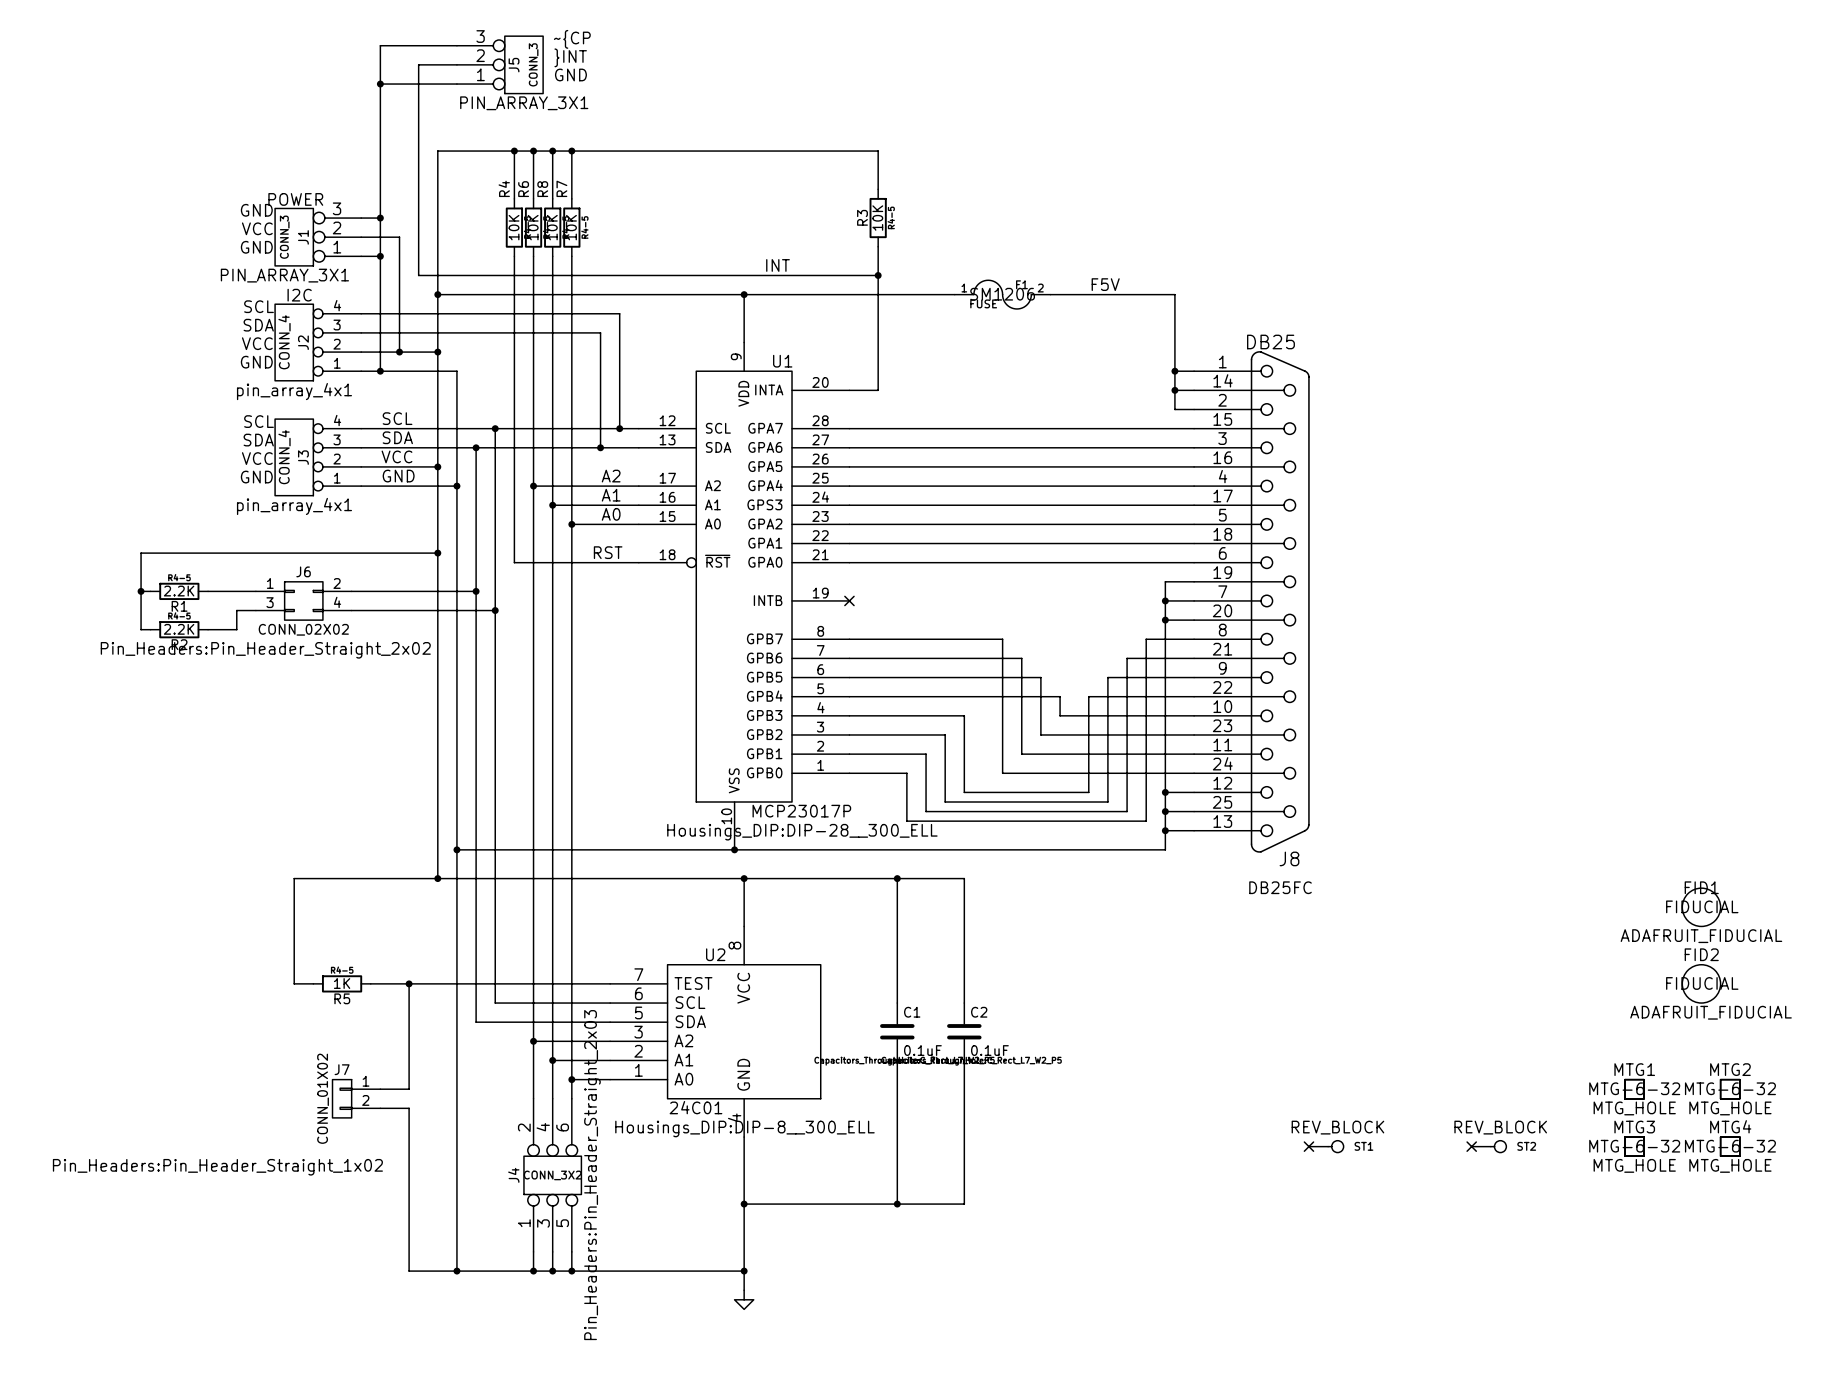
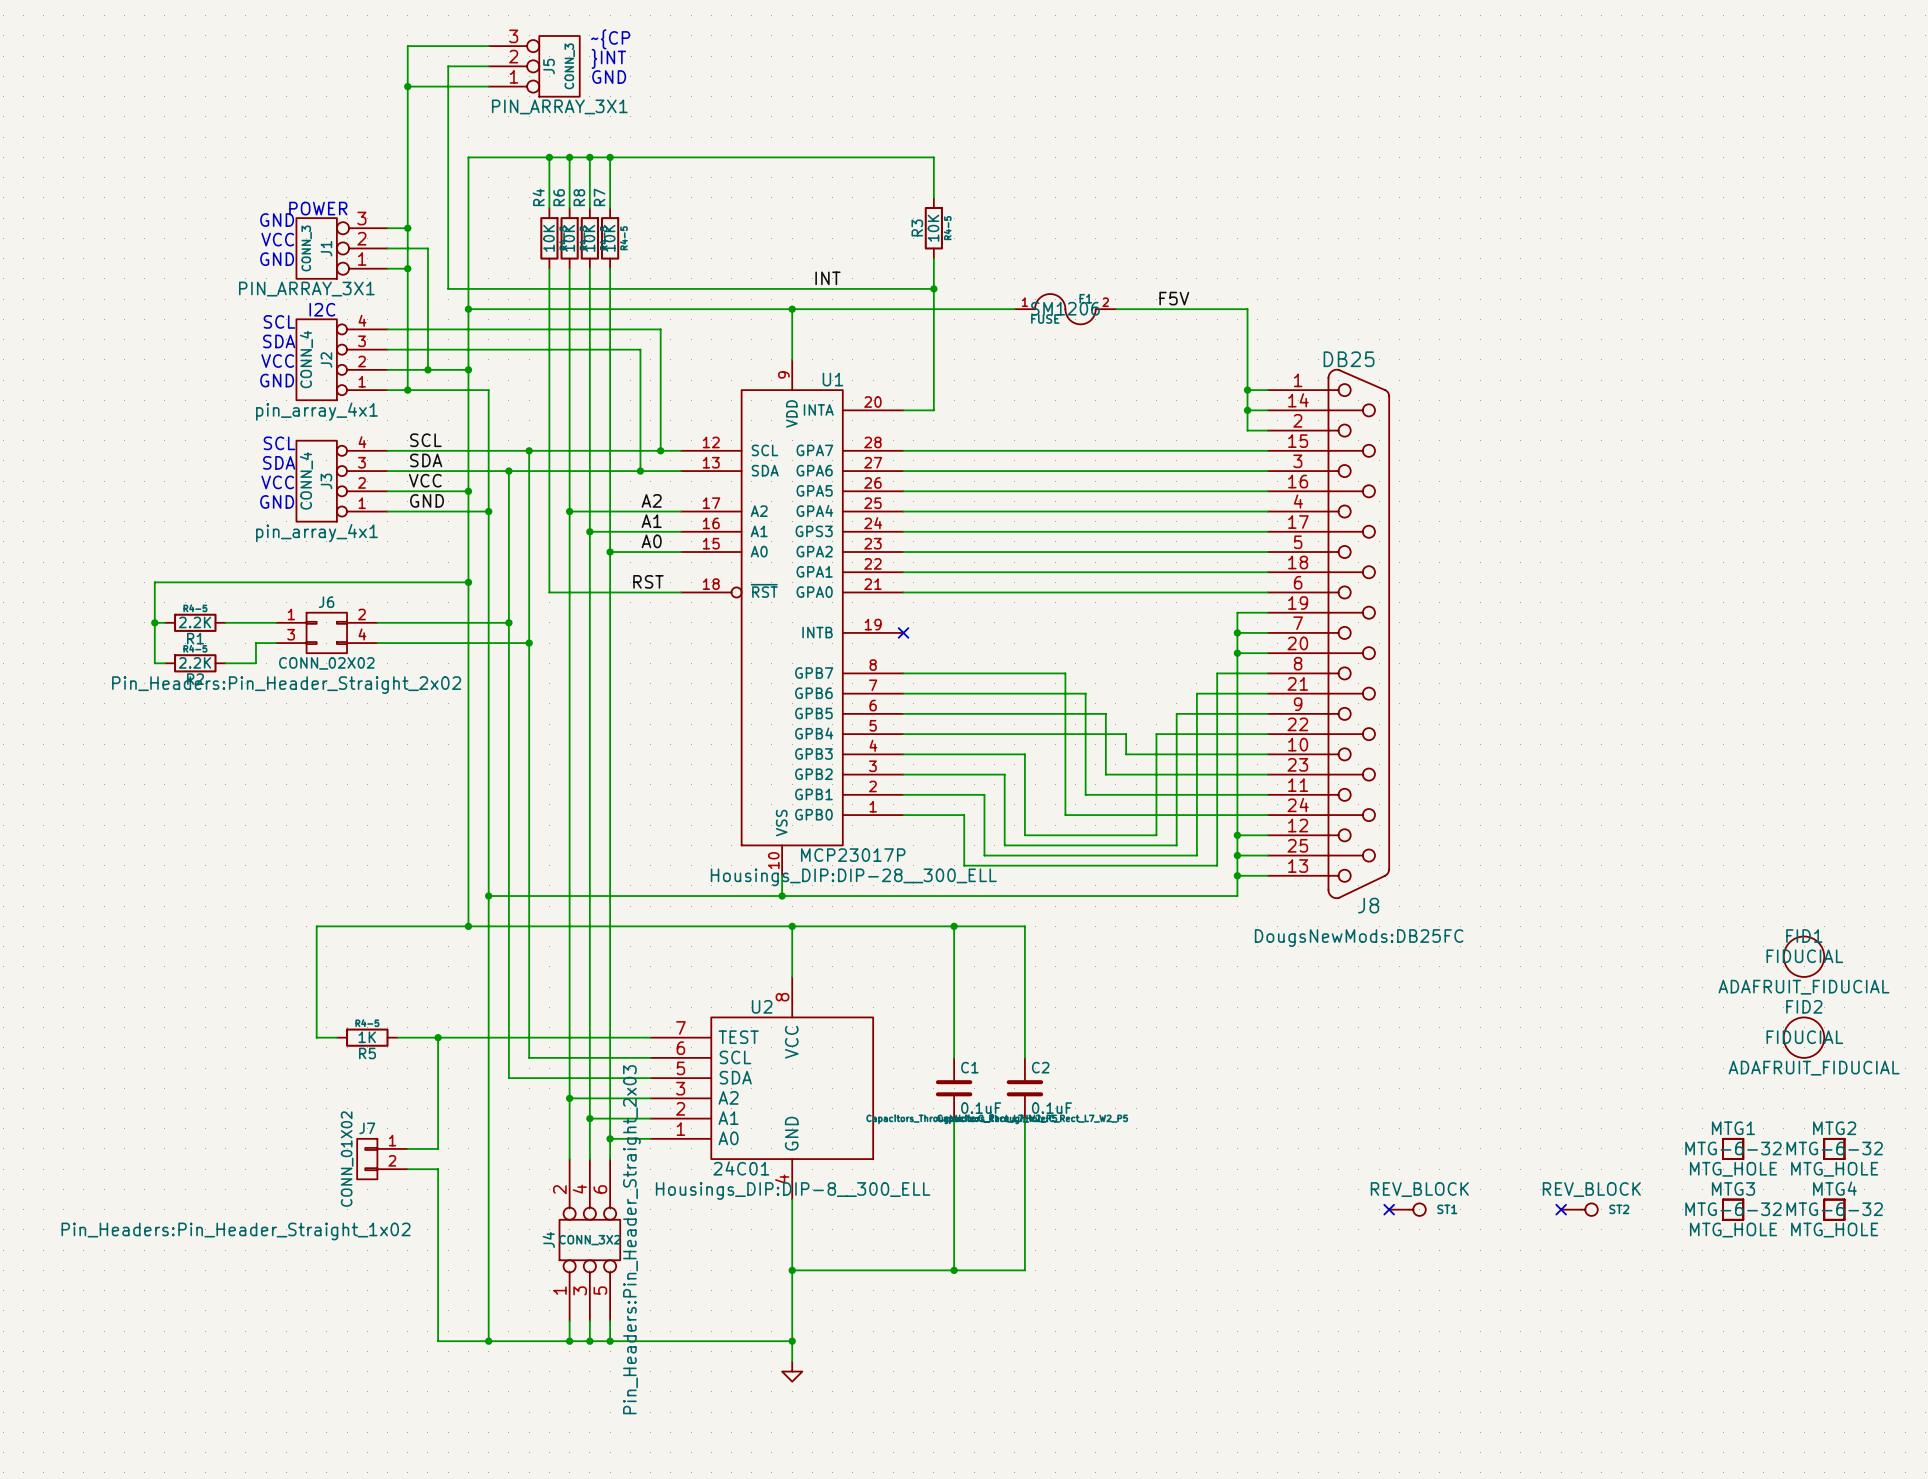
J8 text: DB25FC (1280, 887) -> DougsNewMods:DB25FC (1359, 938)

